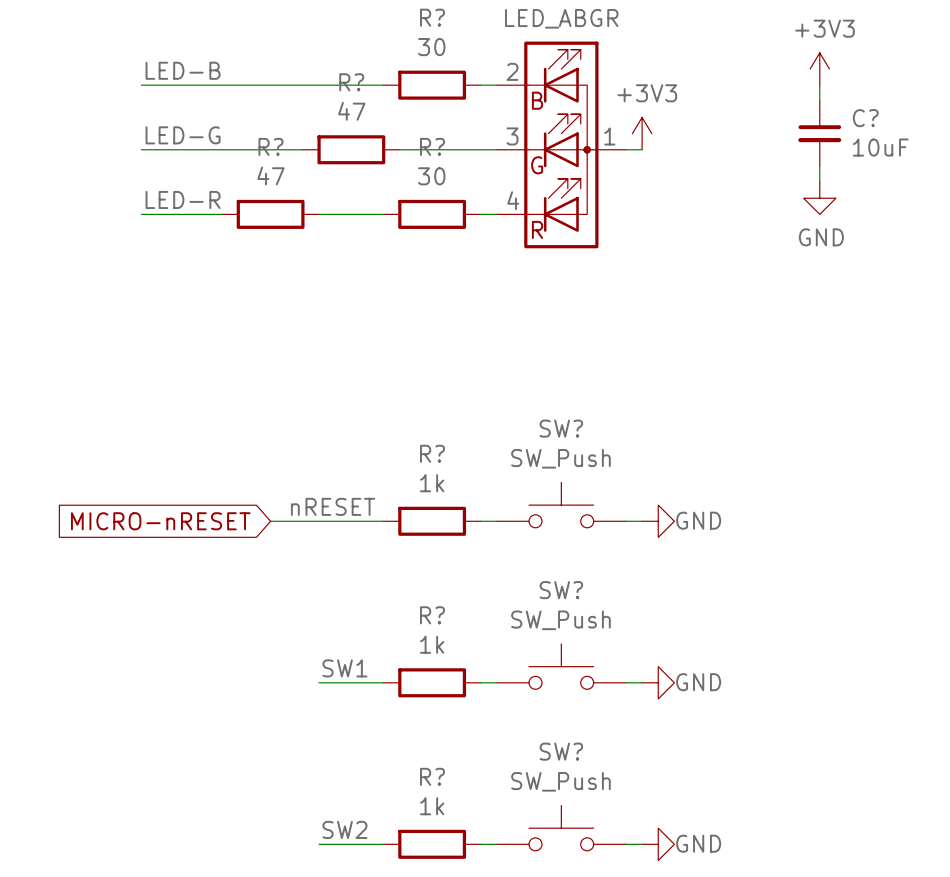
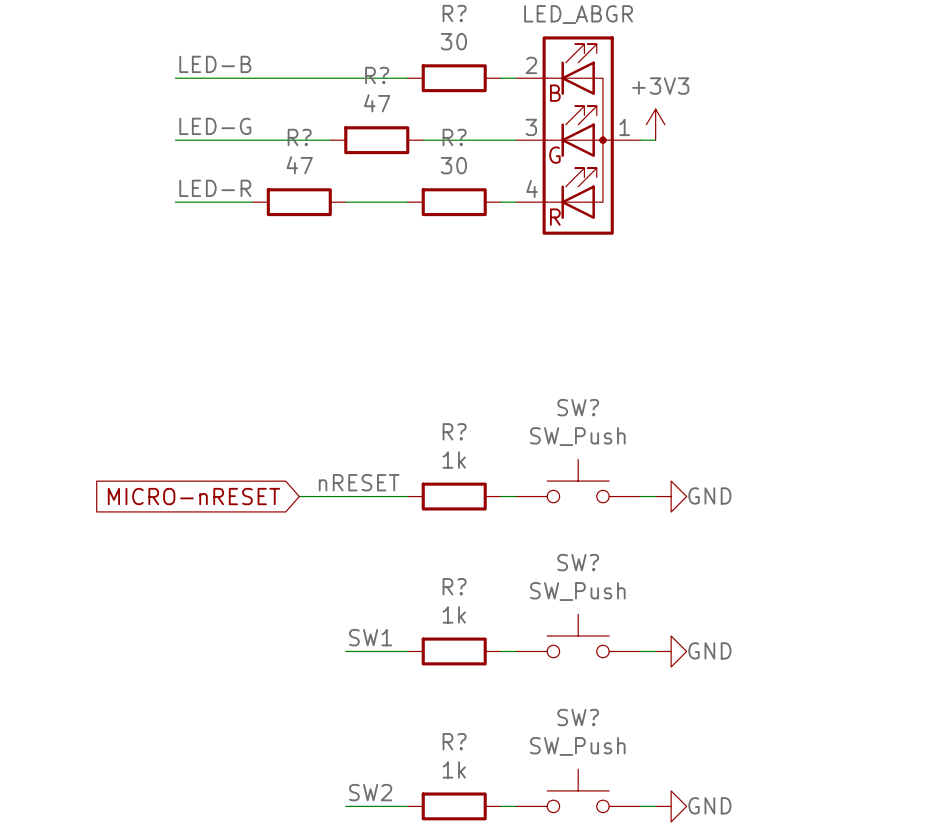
power symbol: +3V3 (819, 69) -> none
wire: (819, 85) (819, 101) -> none
C?: 10uF (819, 133) -> none
wire: (819, 165) (819, 182) -> none
power symbol: GND (819, 198) -> none

